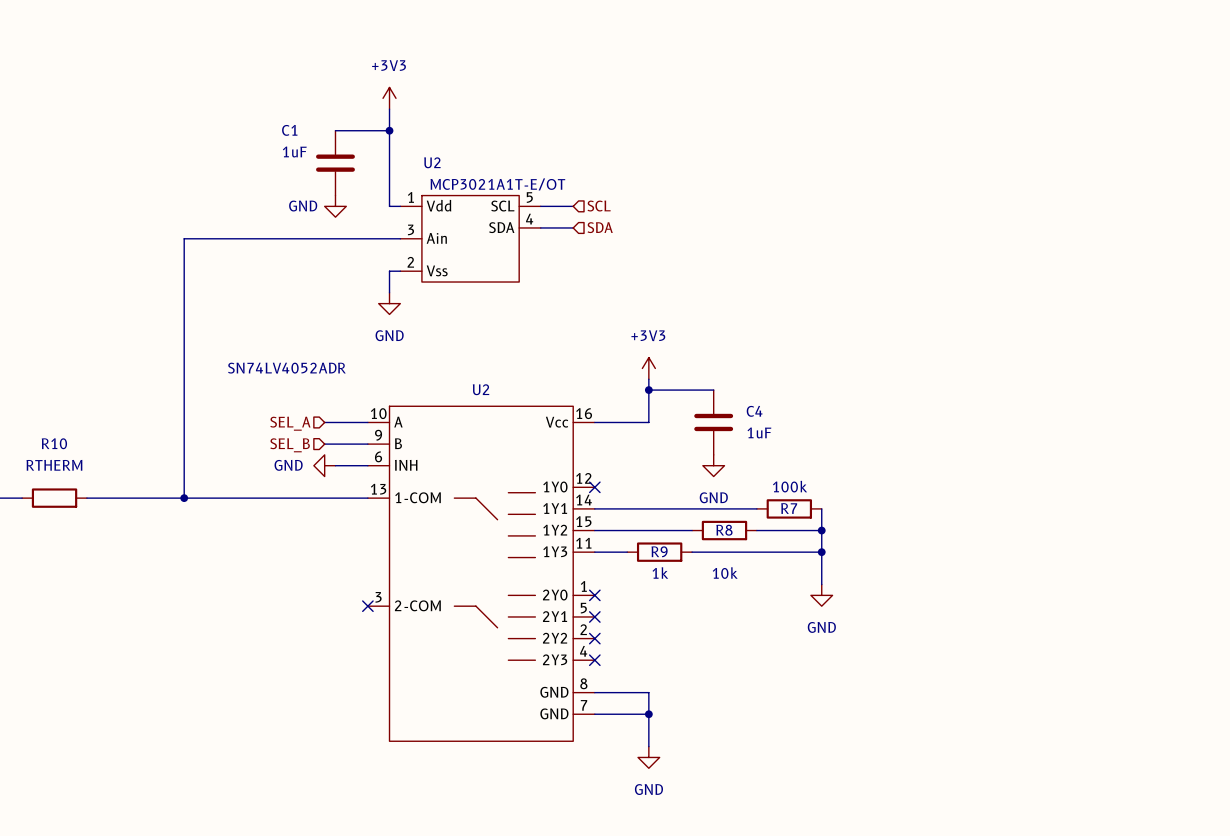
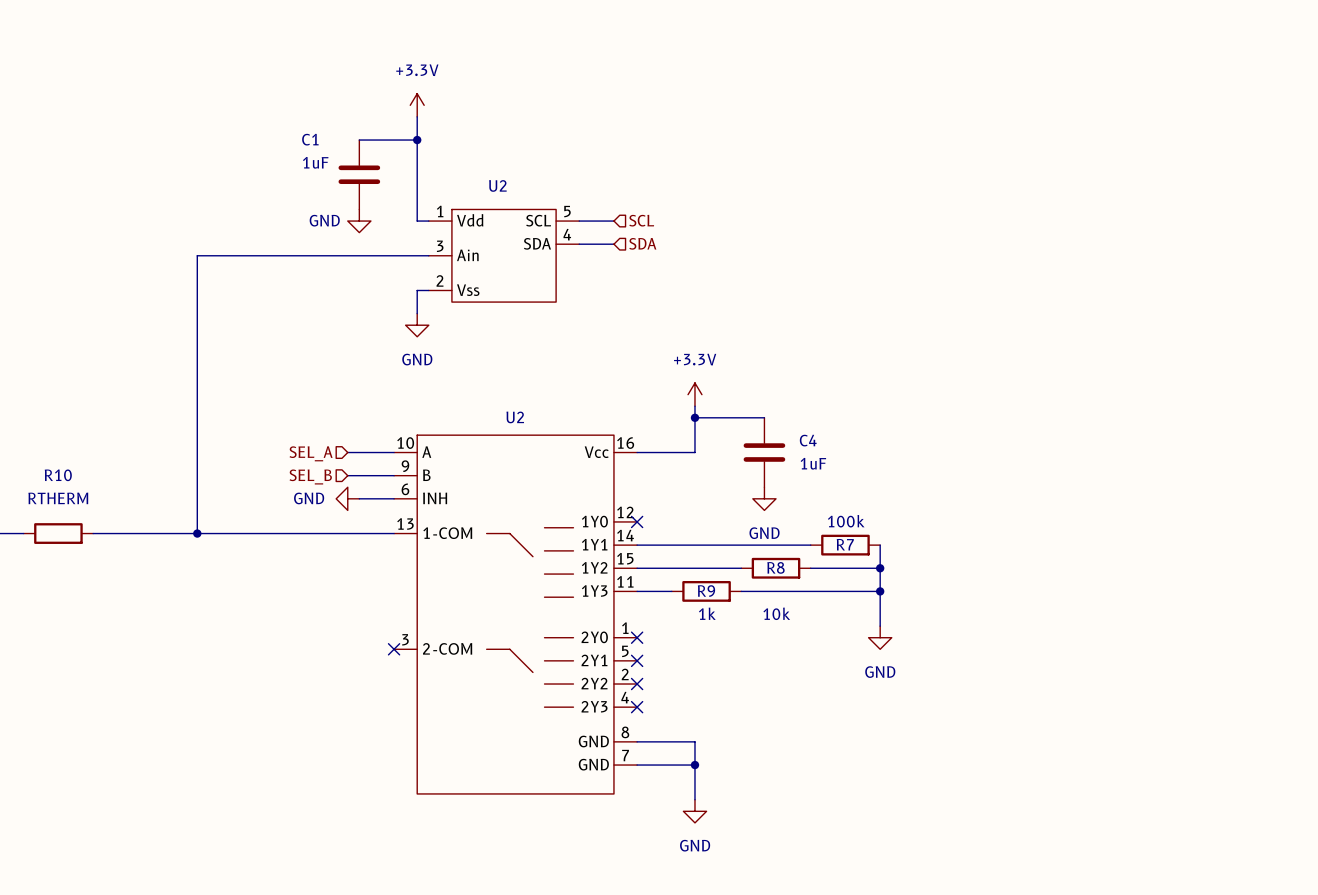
power symbol: +3V3 (389, 98) -> +3.3V (417, 105)
U2 name position: U2 (432, 162) -> U2 (497, 185)
U2 value: MCP3021A1T-E/OT (497, 184) -> none
U2 value: SN74LV4052ADR (286, 368) -> none
power symbol: +3V3 (648, 368) -> +3.3V (694, 394)

